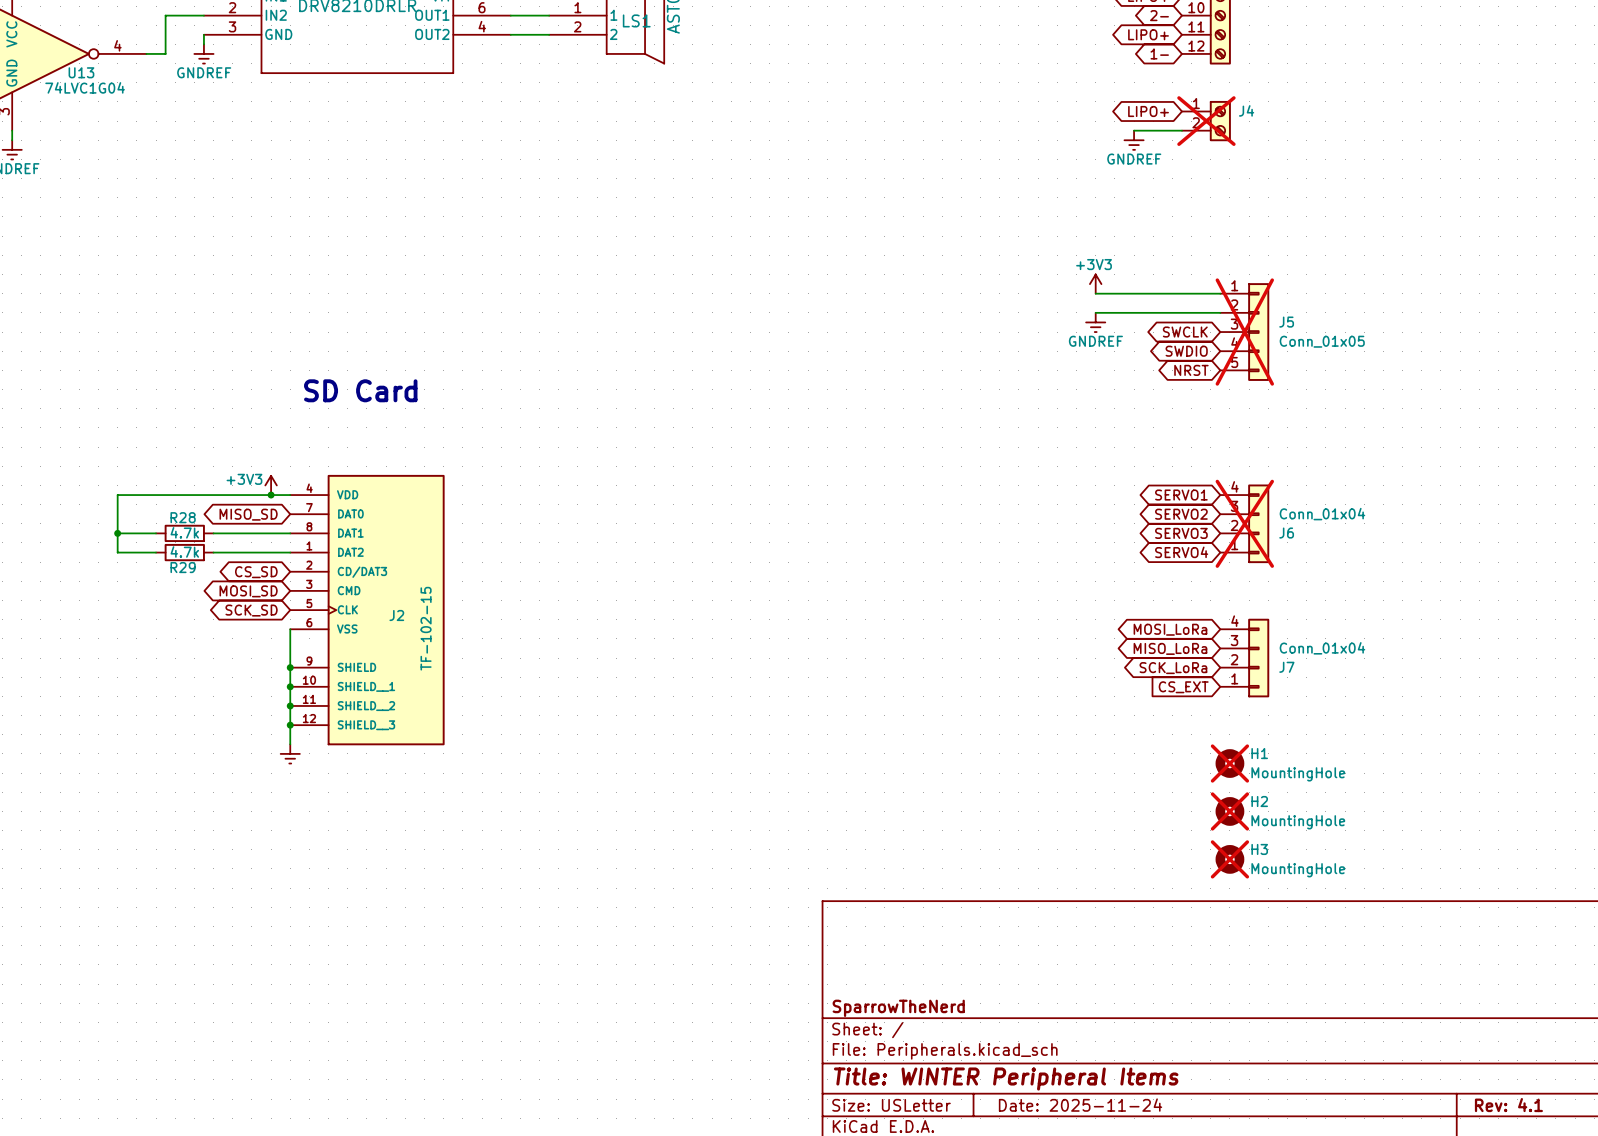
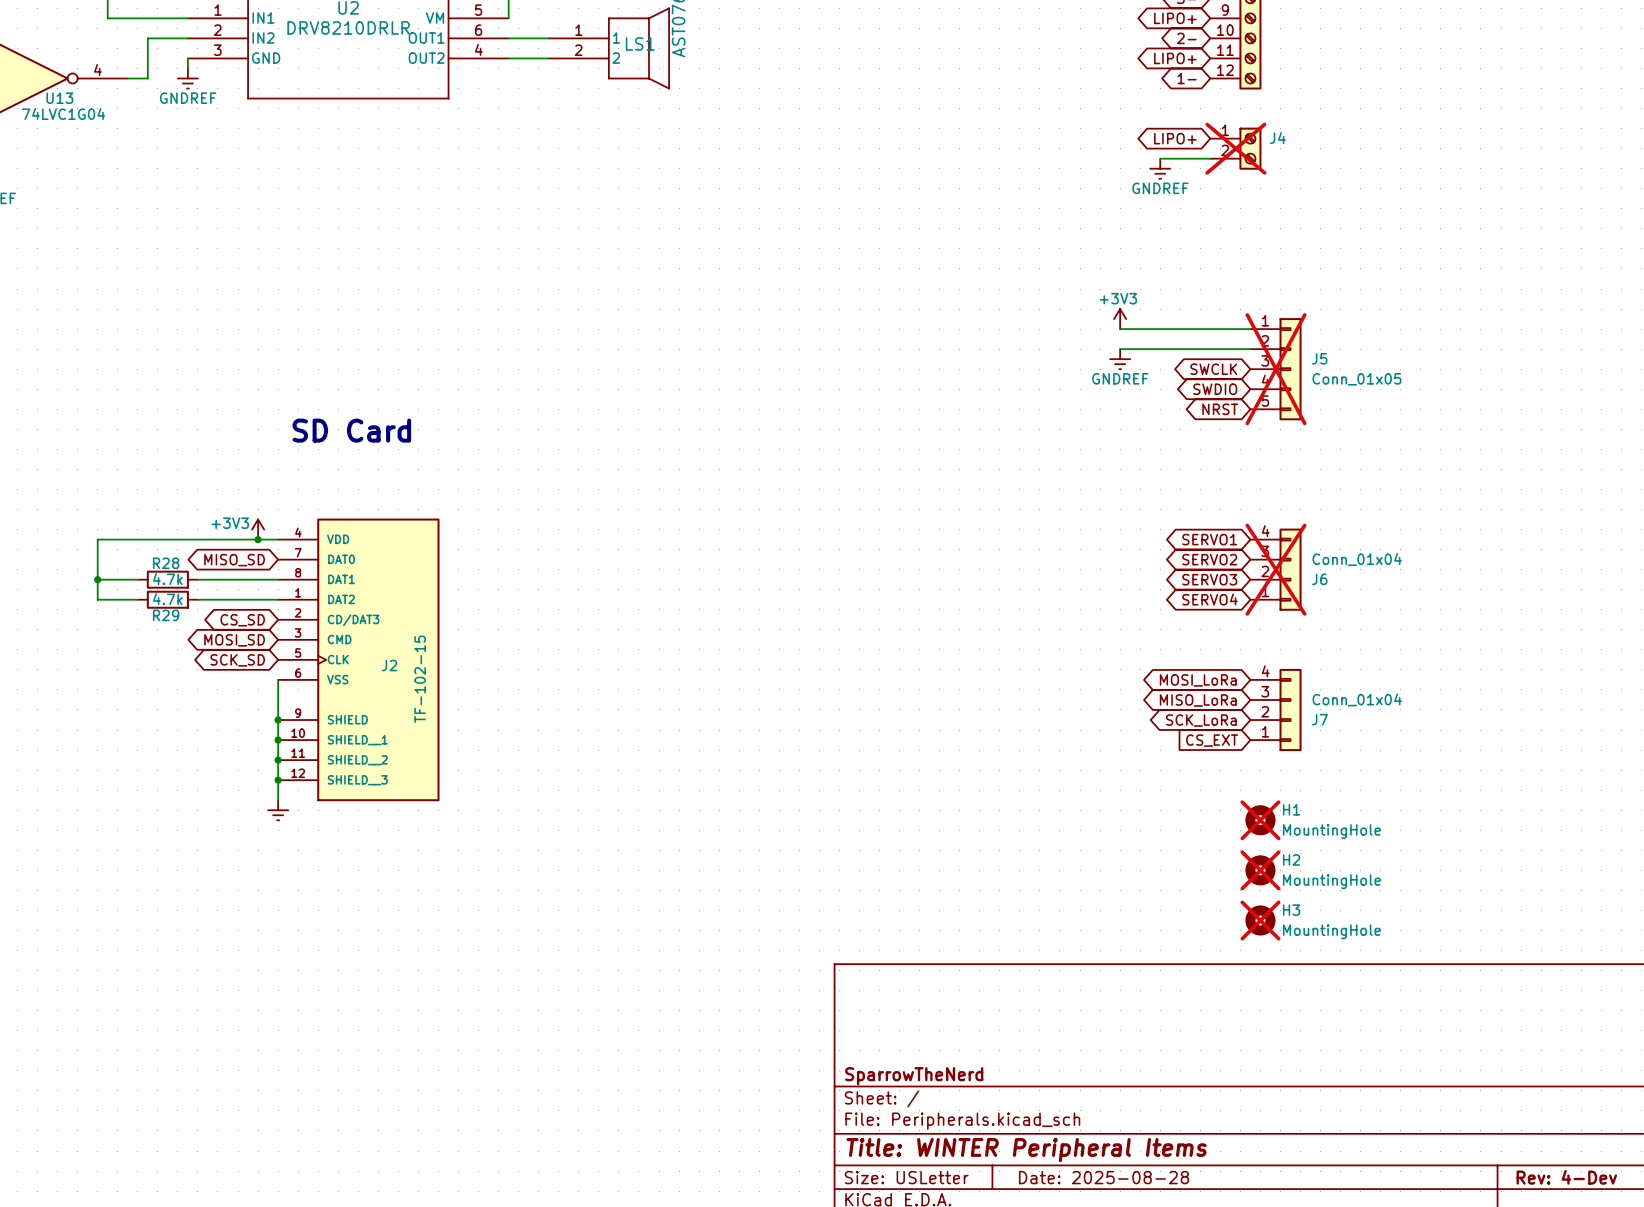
title block: Date: 2025-11-24 (1080, 1105) -> Date: 2025-08-28 (1103, 1177)
title block: Rev: 4.1 (1508, 1105) -> Rev: 4-Dev (1566, 1177)

